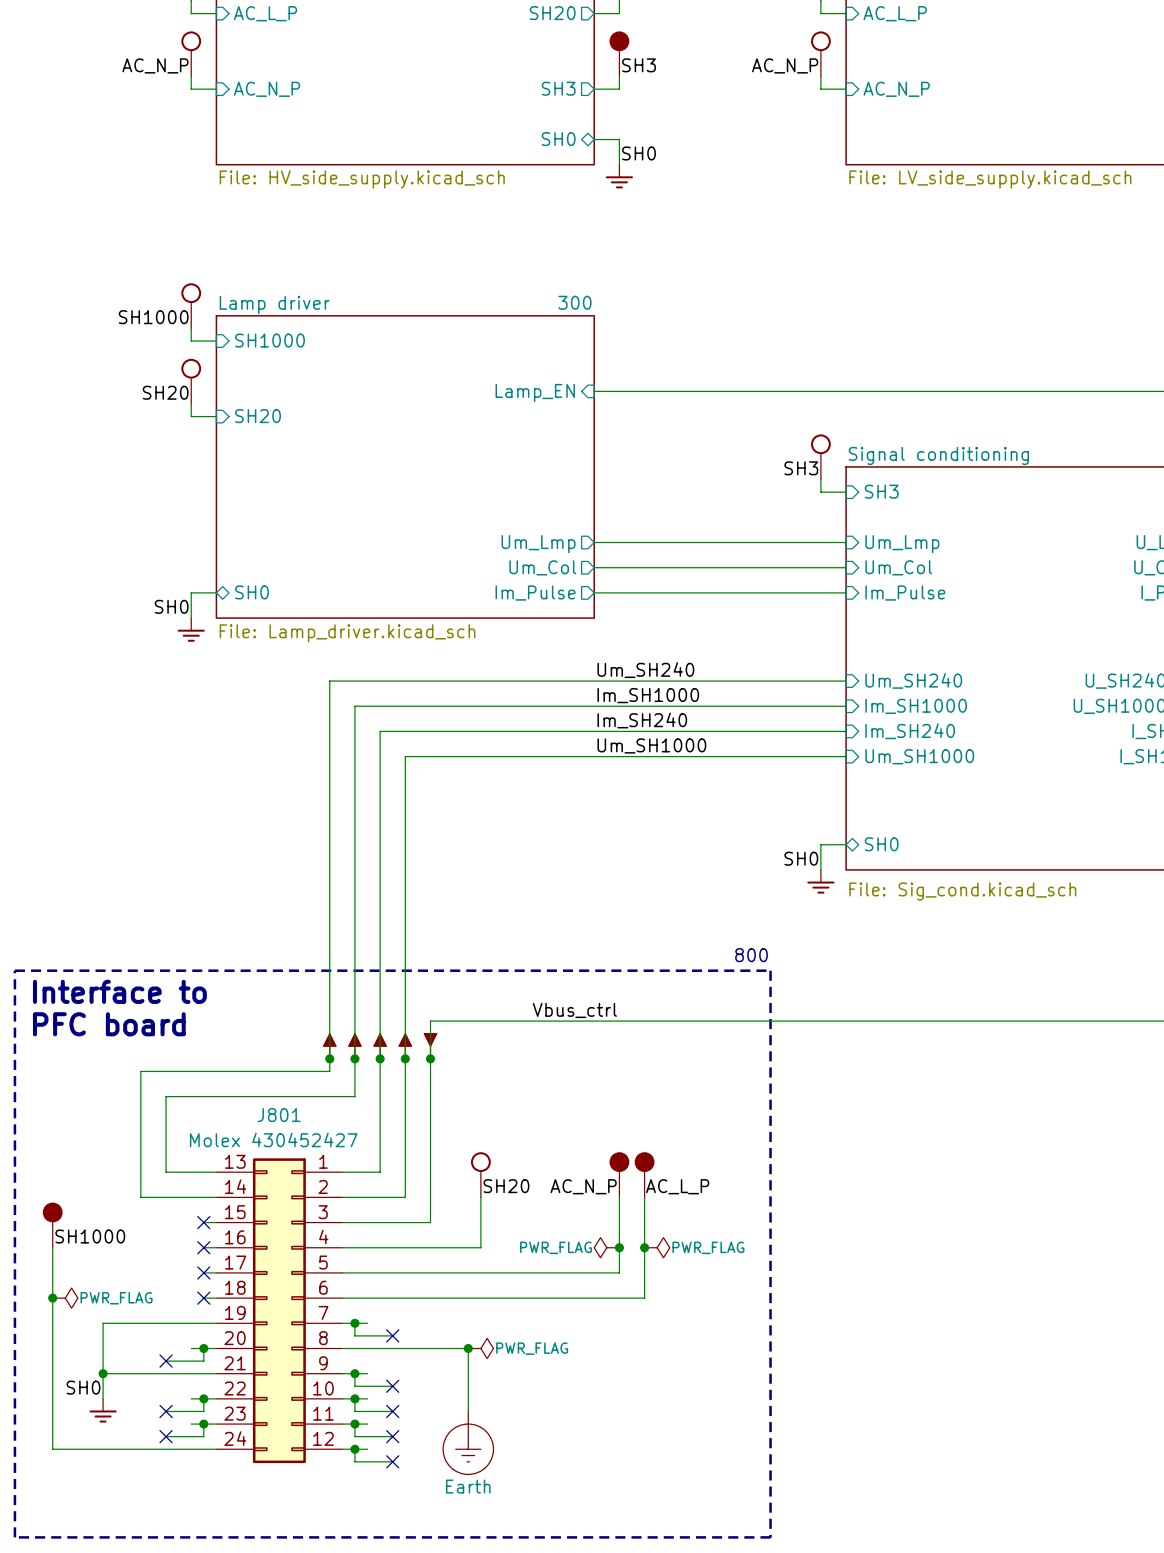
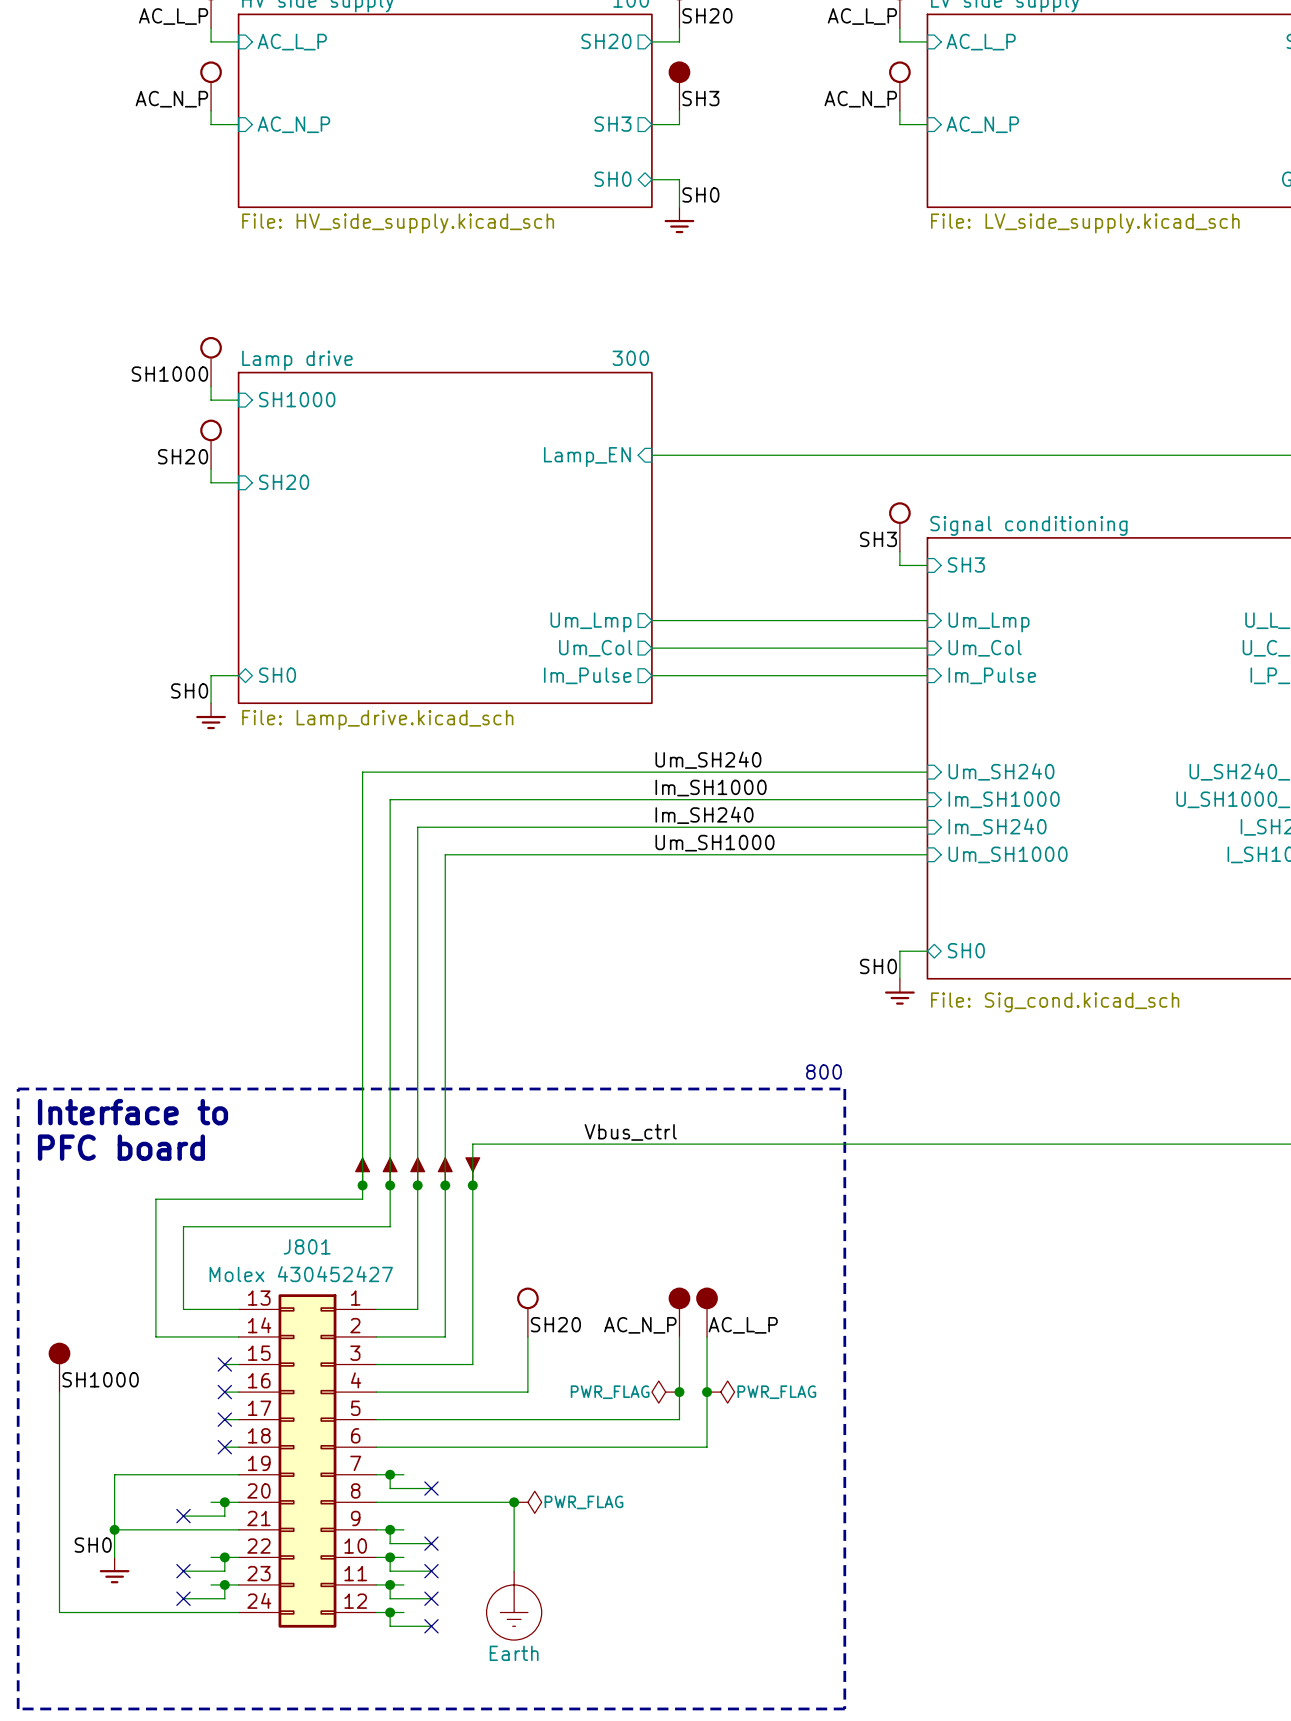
sheet Lamp driver name: Lamp driver (274, 304) -> Lamp drive (297, 360)
sheet Lamp driver value: File: Lamp_driver.kicad_sch (347, 633) -> File: Lamp_drive.kicad_sch (377, 719)
junction: (52, 1298) -> none
power symbol: PWR_FLAG (65, 1298) -> none

